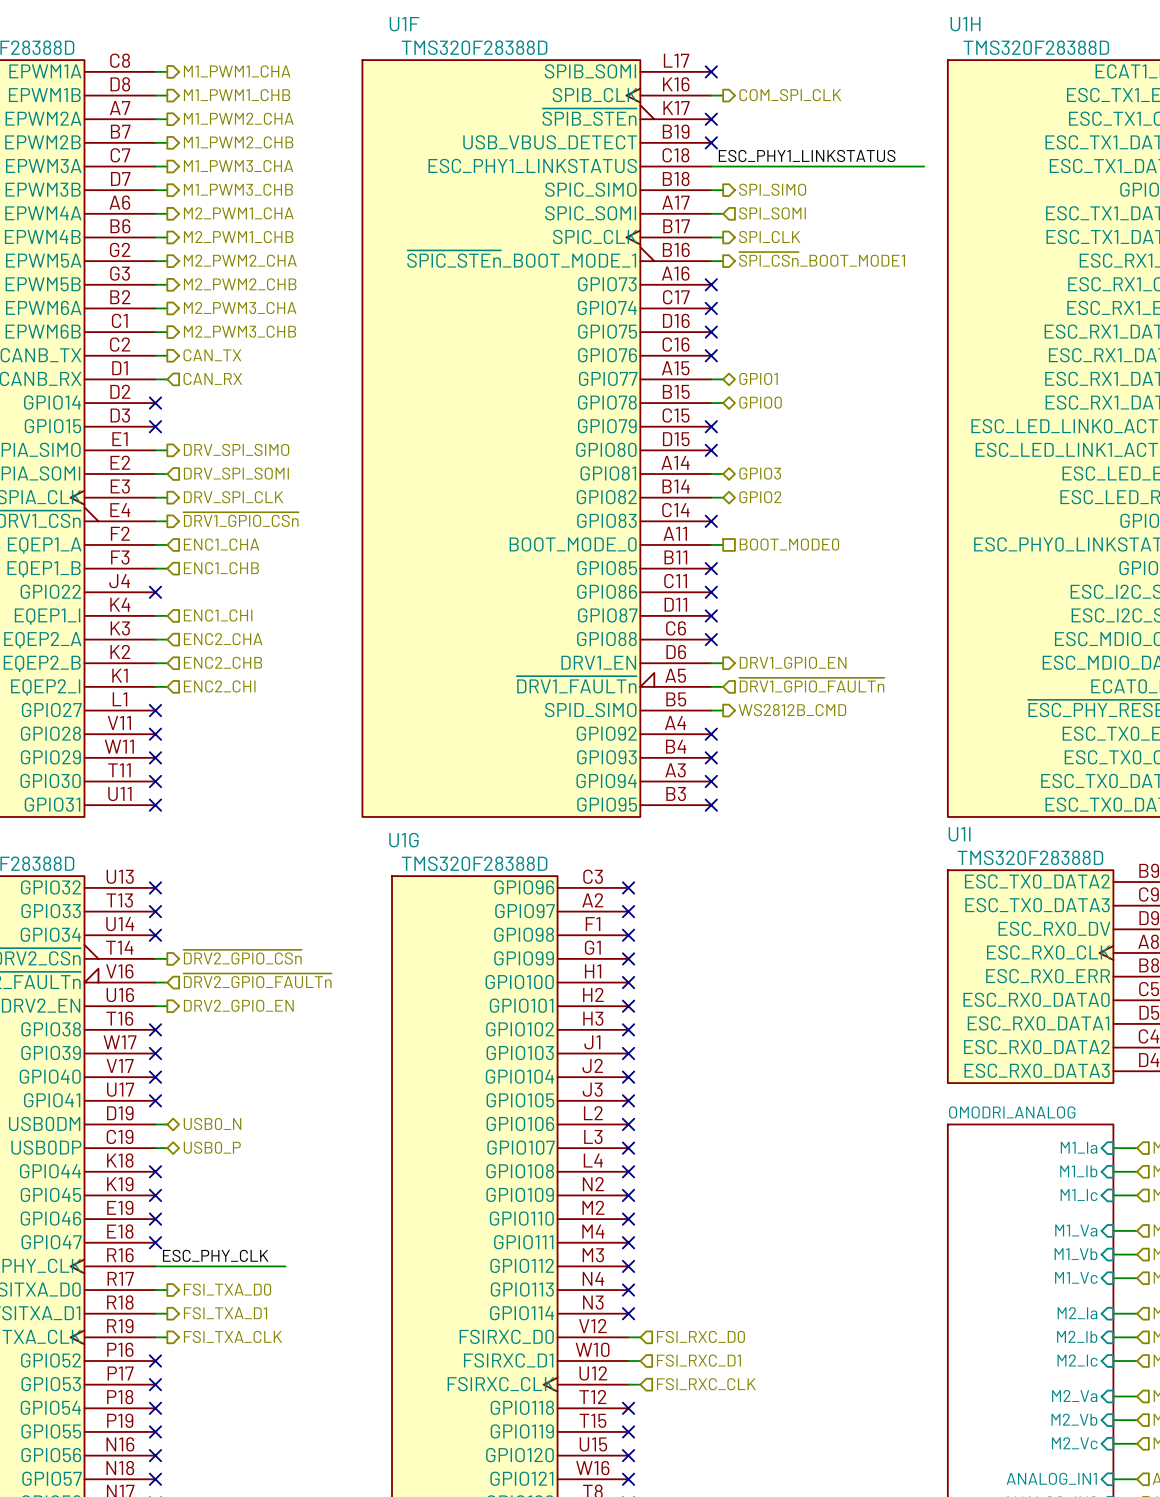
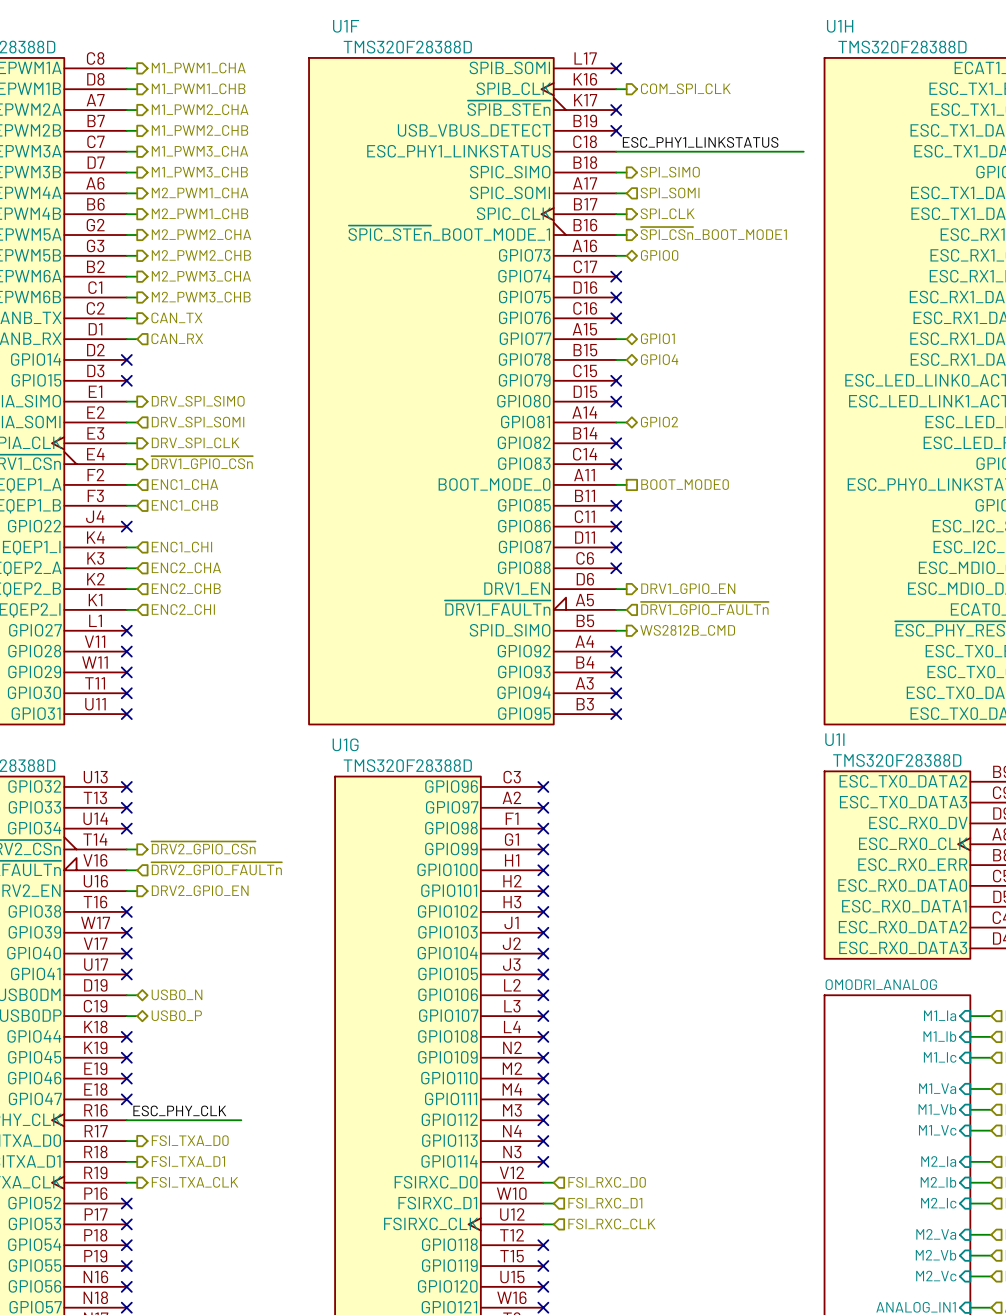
no-connect mark: (711, 284) -> none
hierarchical label: none -> GPIO0 (659, 255)
hierarchical label: GPIO0 (760, 402) -> GPIO4 (659, 359)
hierarchical label: GPIO3 (760, 473) -> GPIO2 (659, 422)
wire: (711, 497) (723, 497) -> (616, 255) (626, 255)
no-connect mark: none -> (616, 443)
hierarchical label: GPIO2 (760, 497) -> none

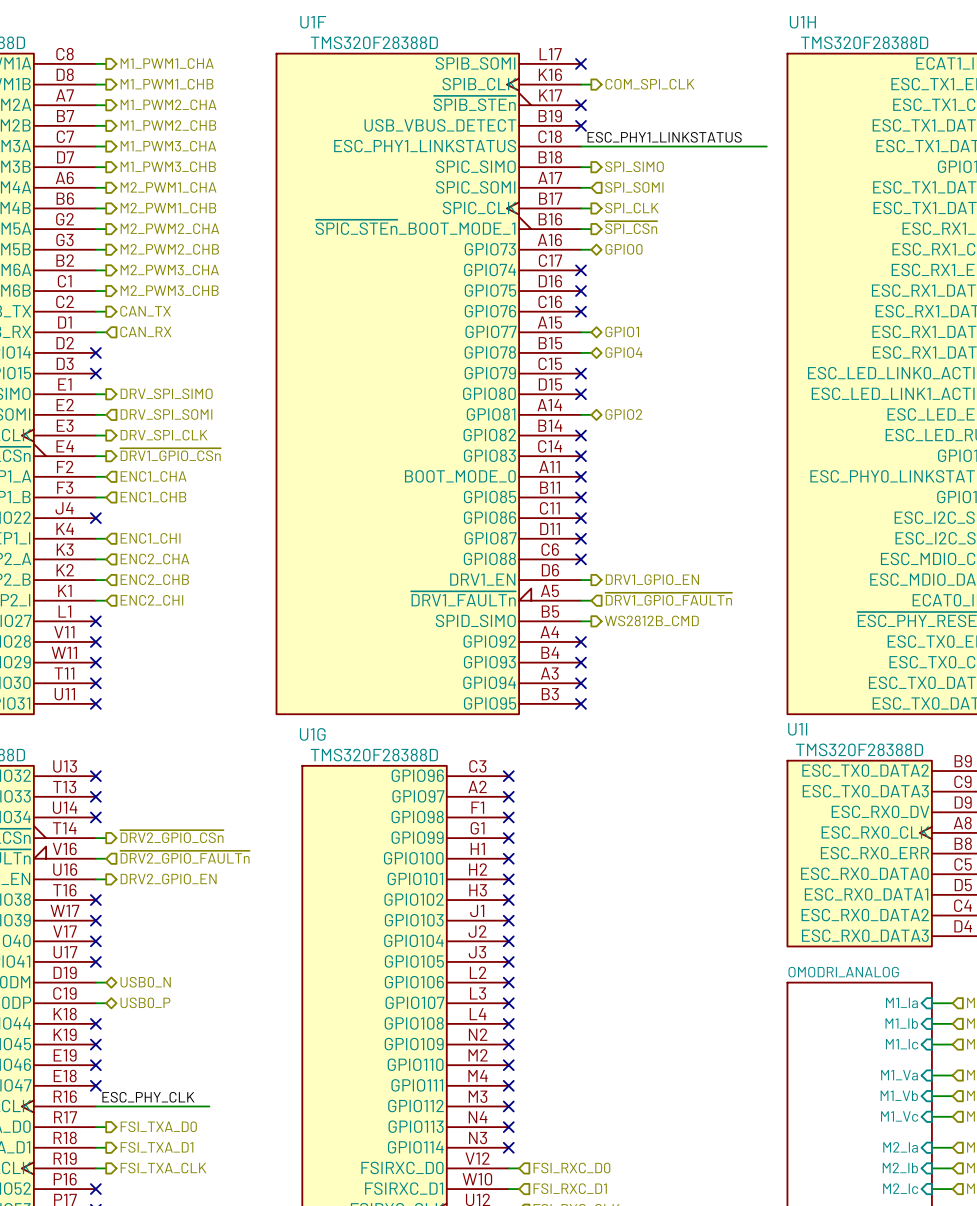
hierarchical label: ~{SPI_CSn}_BOOT_MODE1 (713, 233) -> ~{SPI_CSn} (631, 227)
wire: (616, 484) (626, 484) -> none
no-connect mark: none -> (581, 476)
hierarchical label: BOOT_MODE0 (685, 484) -> none

